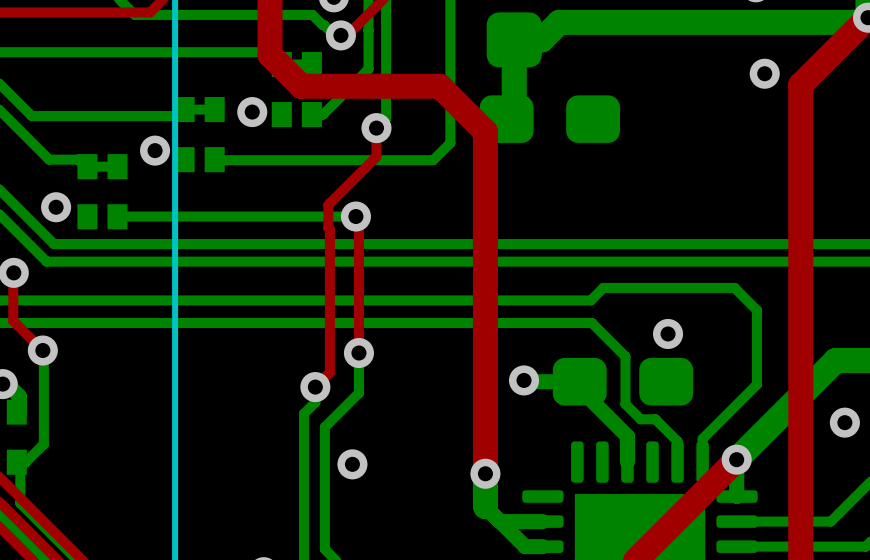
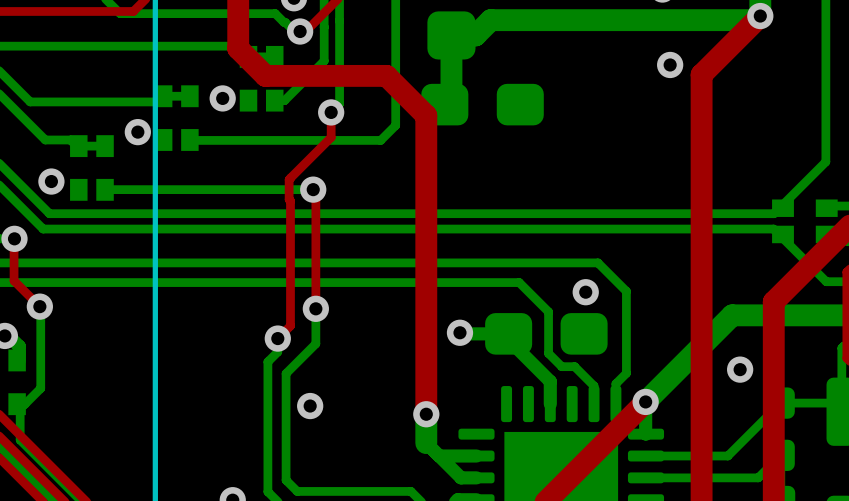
bottom track: (590, 300) (603, 287) (734, 287) (756, 310) (756, 384) (714, 426) -> (518, 262) (597, 262) (626, 291) (626, 373)

